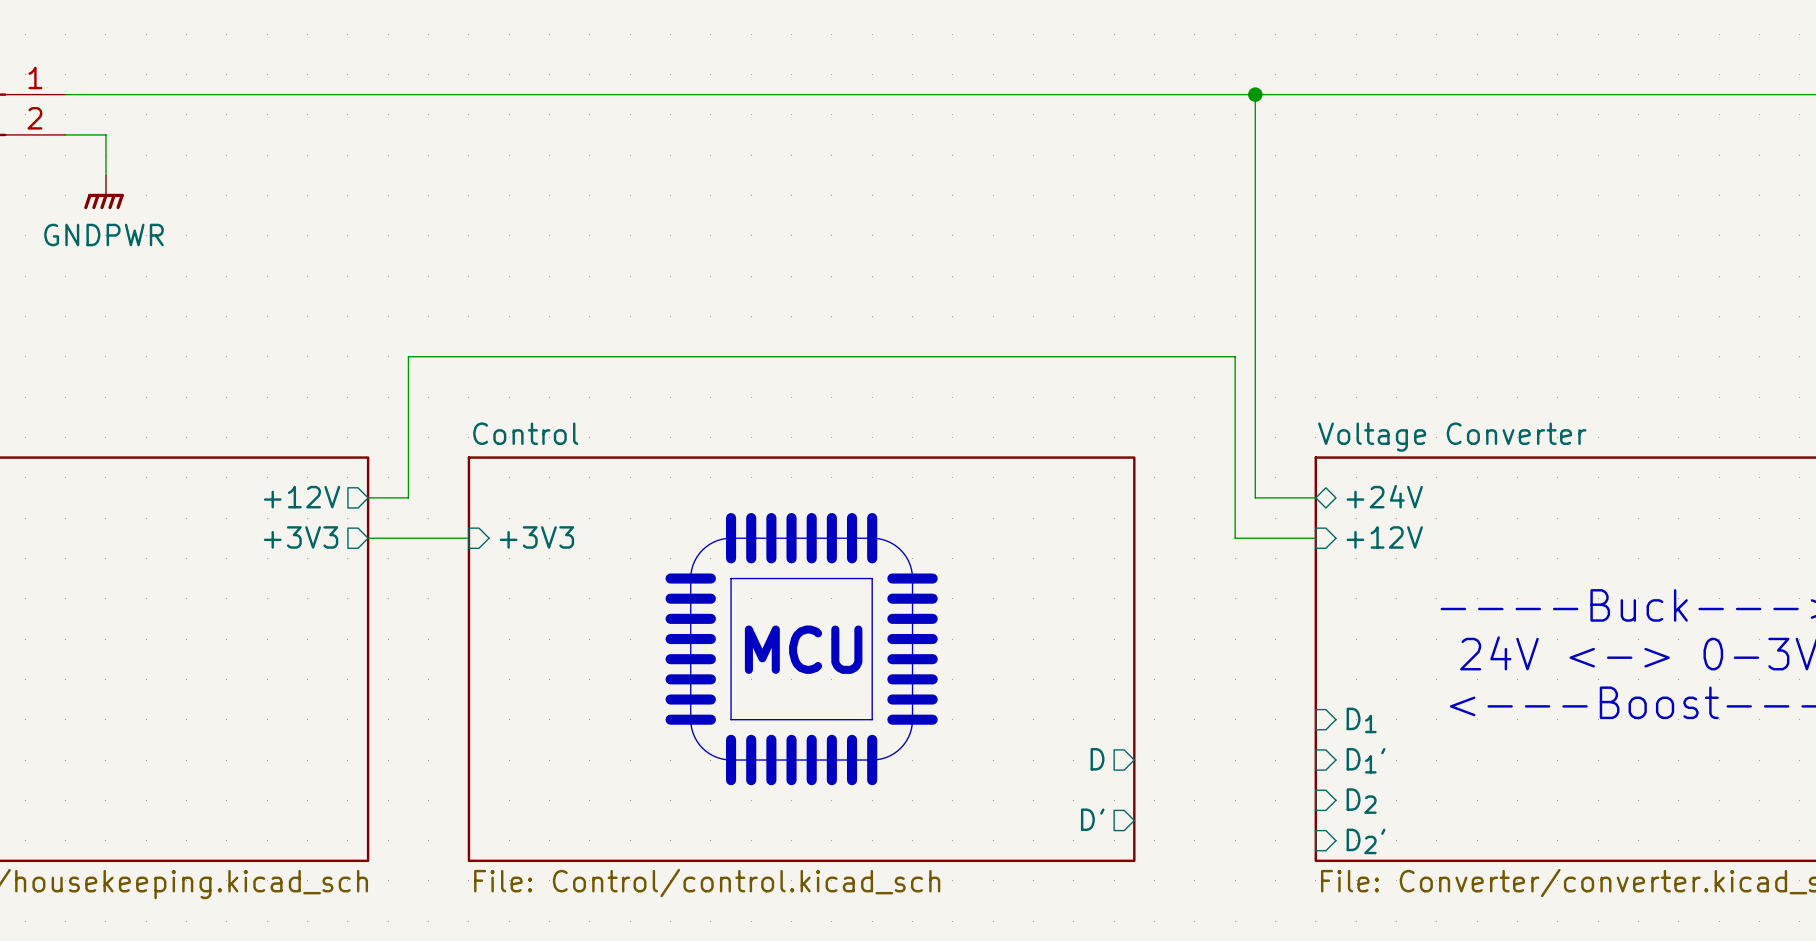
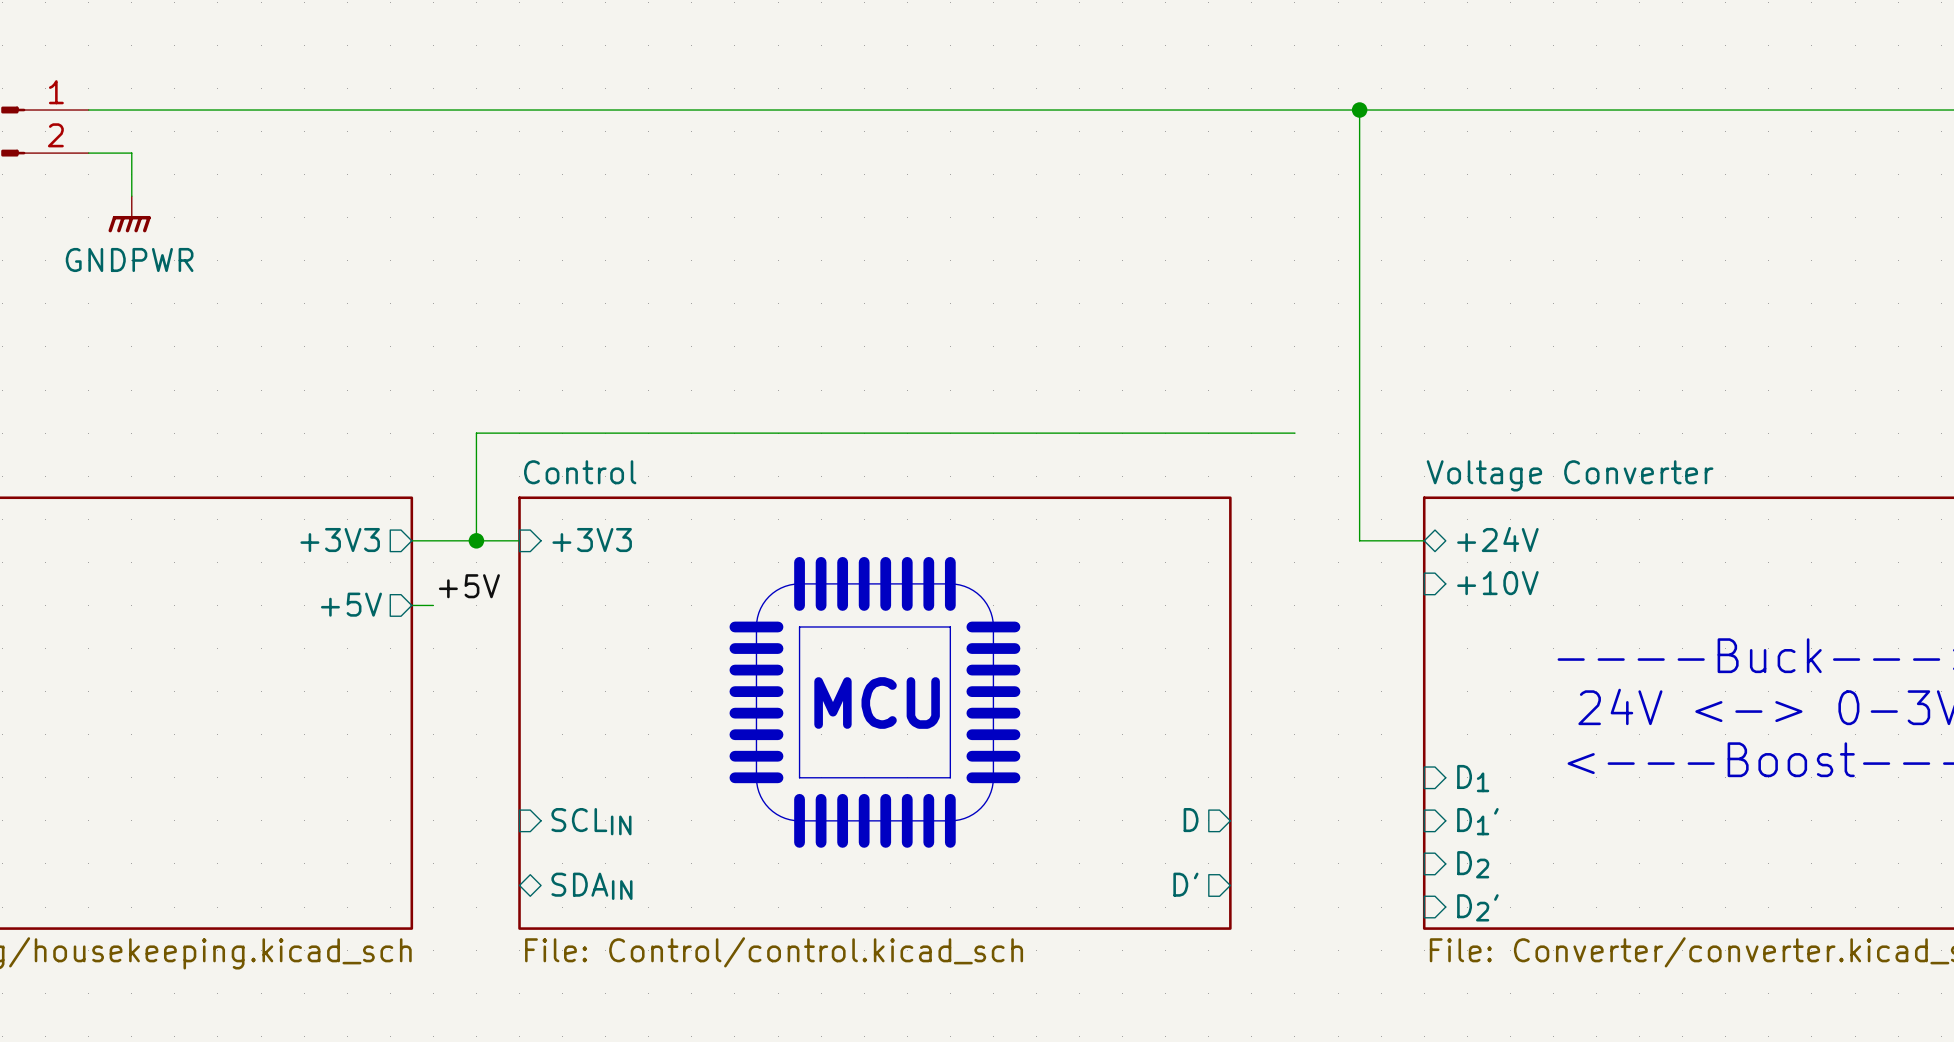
wire: none -> (1294, 433) (476, 433) (476, 540)
sheet pin: +12V (302, 497) -> +3V3 (340, 540)
wire: (408, 497) (408, 356) (1235, 356) (1235, 538) (1315, 538) -> (454, 540) (519, 540)
junction: none -> (476, 540)
sheet pin: +3V3 (301, 537) -> none
sheet pin position: +3V3 (536, 537) -> +3V3 (592, 540)
sheet pin: +12V (1384, 537) -> +10V (1497, 583)
wire: (368, 538) (468, 538) -> none
label: none -> +5V (469, 586)
sheet pin: none -> +5V (351, 604)
wire: none -> (411, 605) (433, 605)
sheet pin: none -> SCLIN (591, 821)
sheet pin: none -> SDAIN (591, 886)

